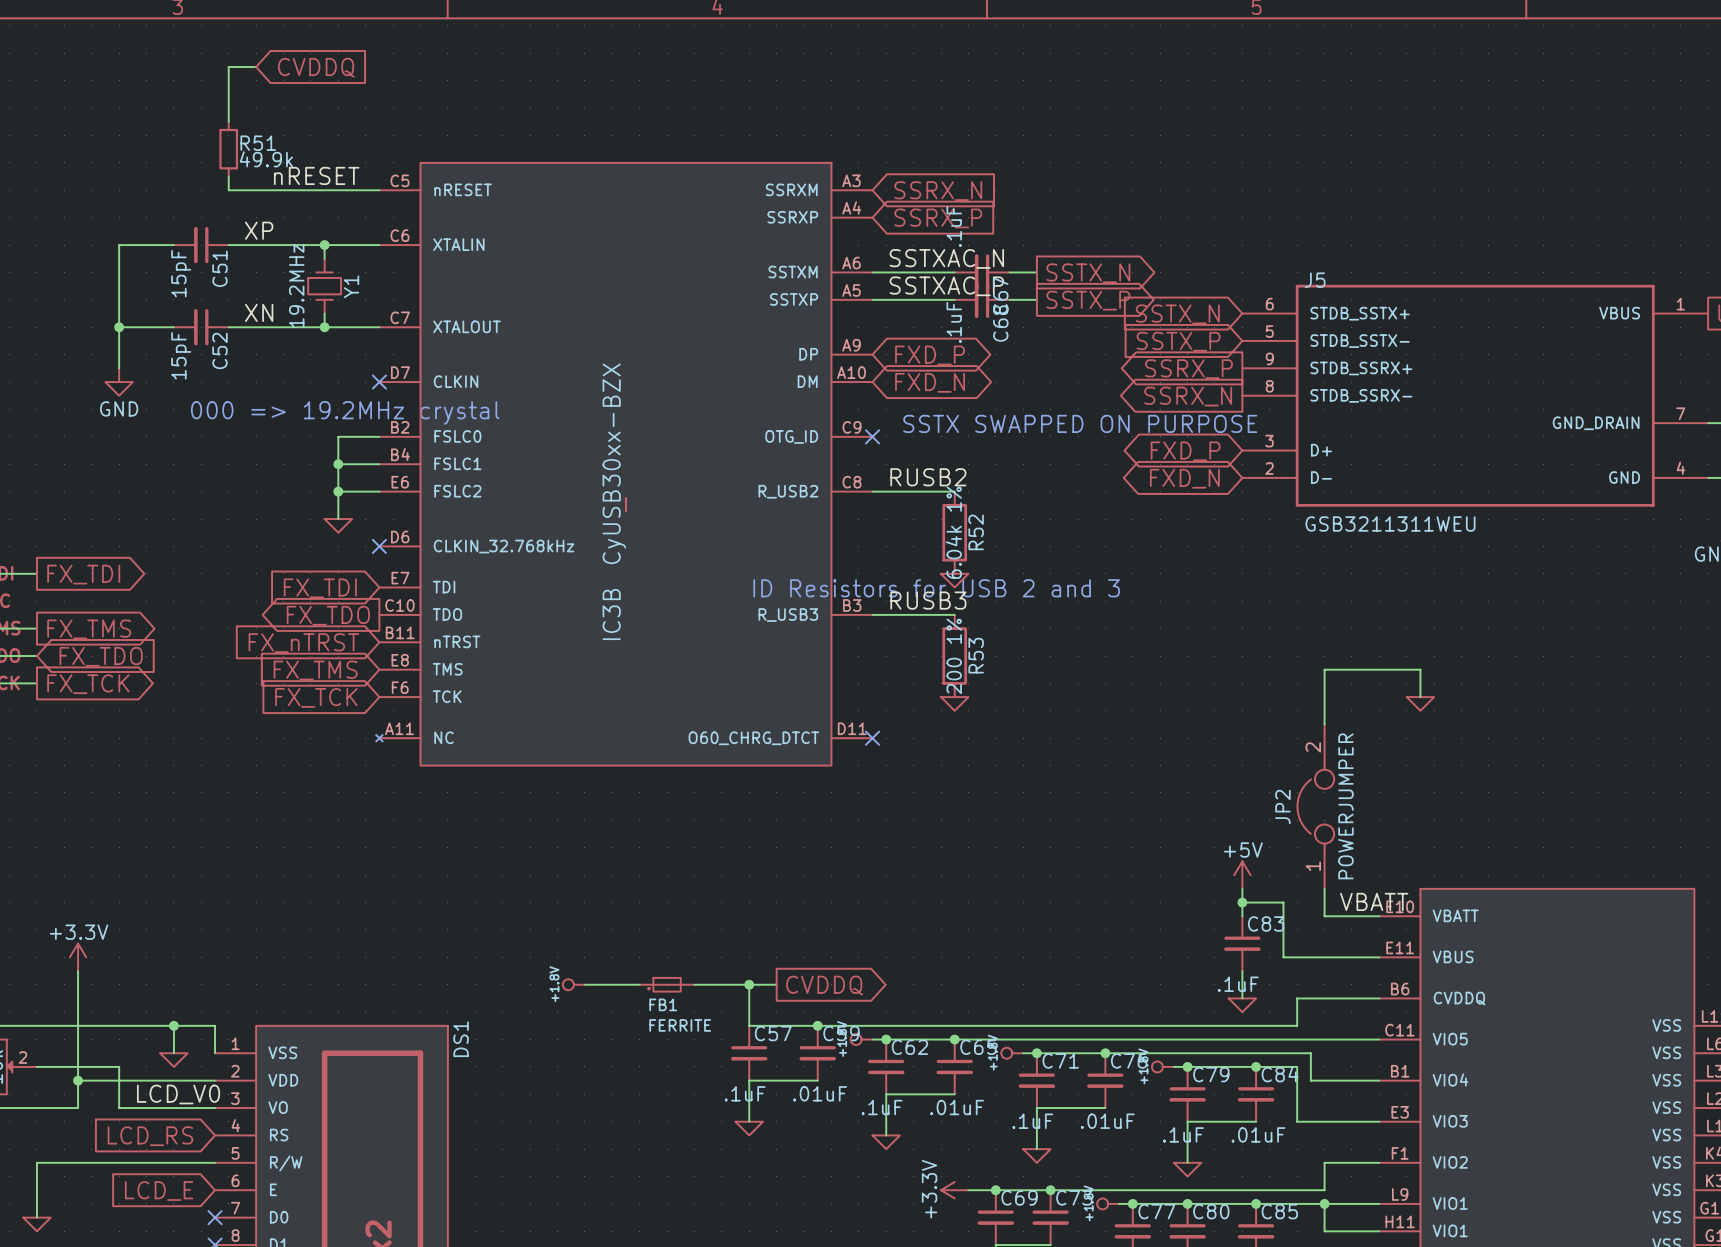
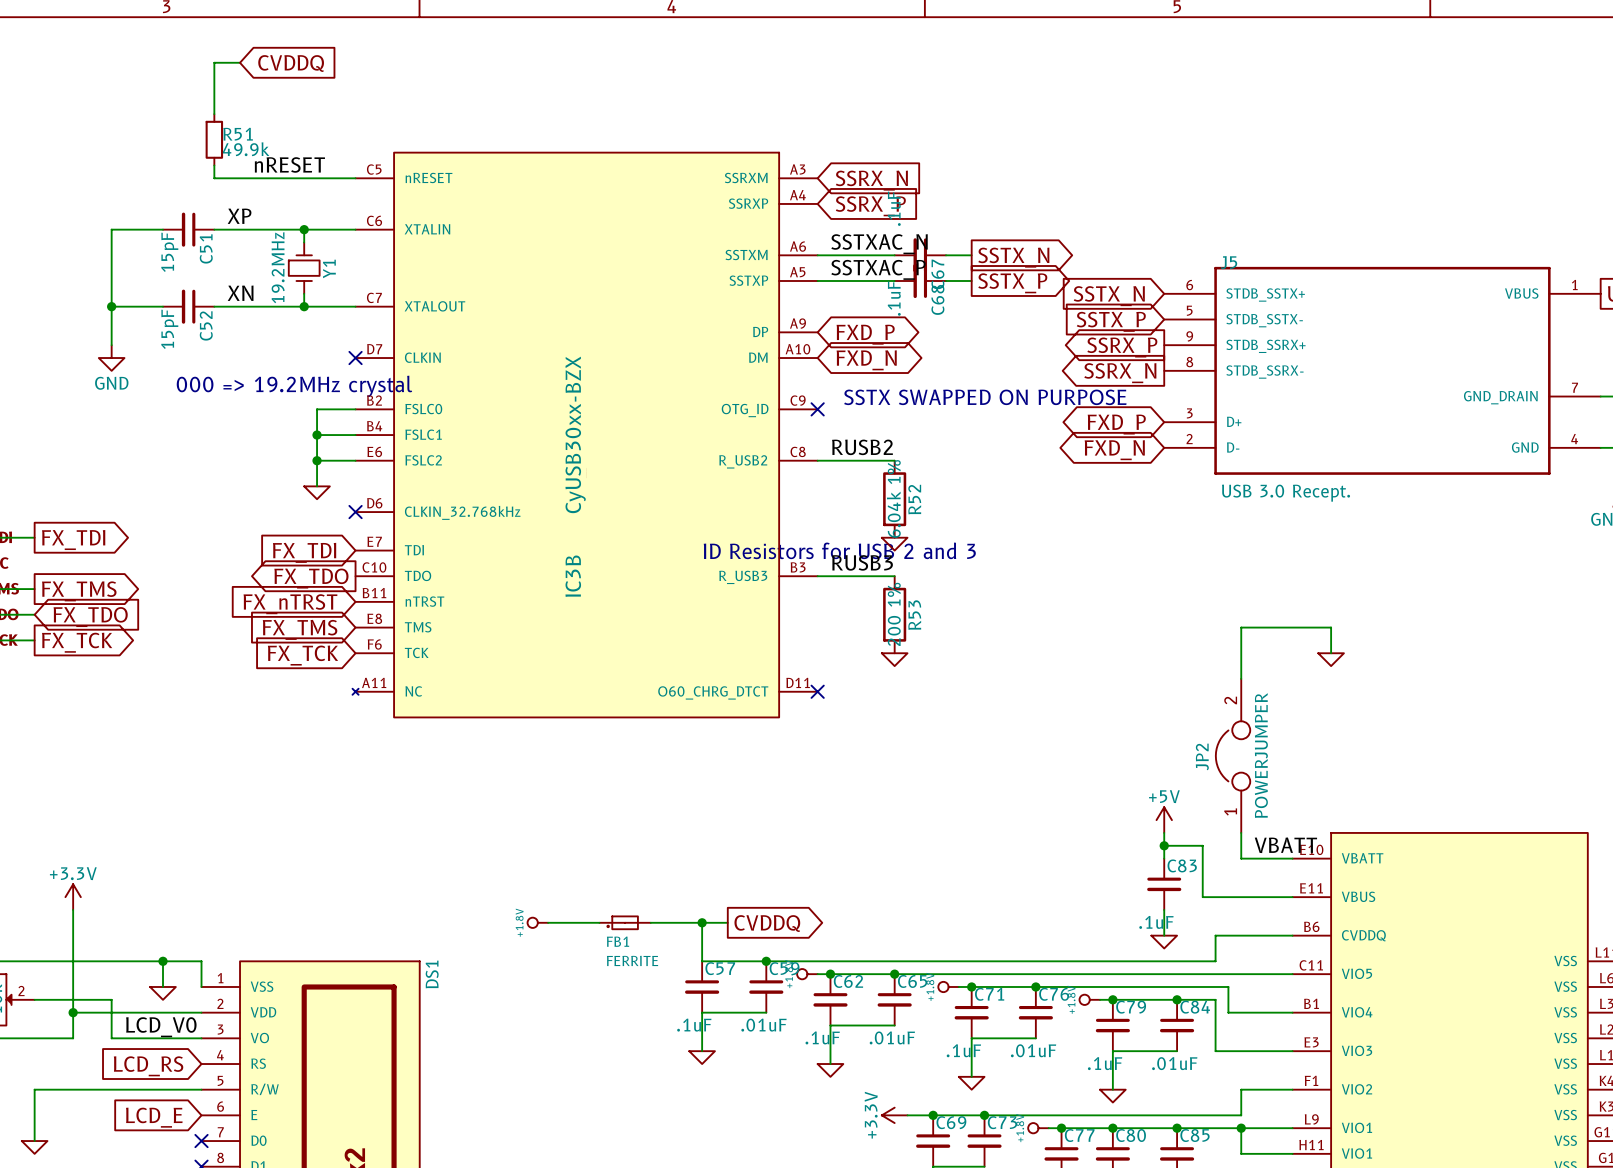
J5 value: GSB3211311WEU (1390, 523) -> USB 3.0 Recept. (1286, 493)

